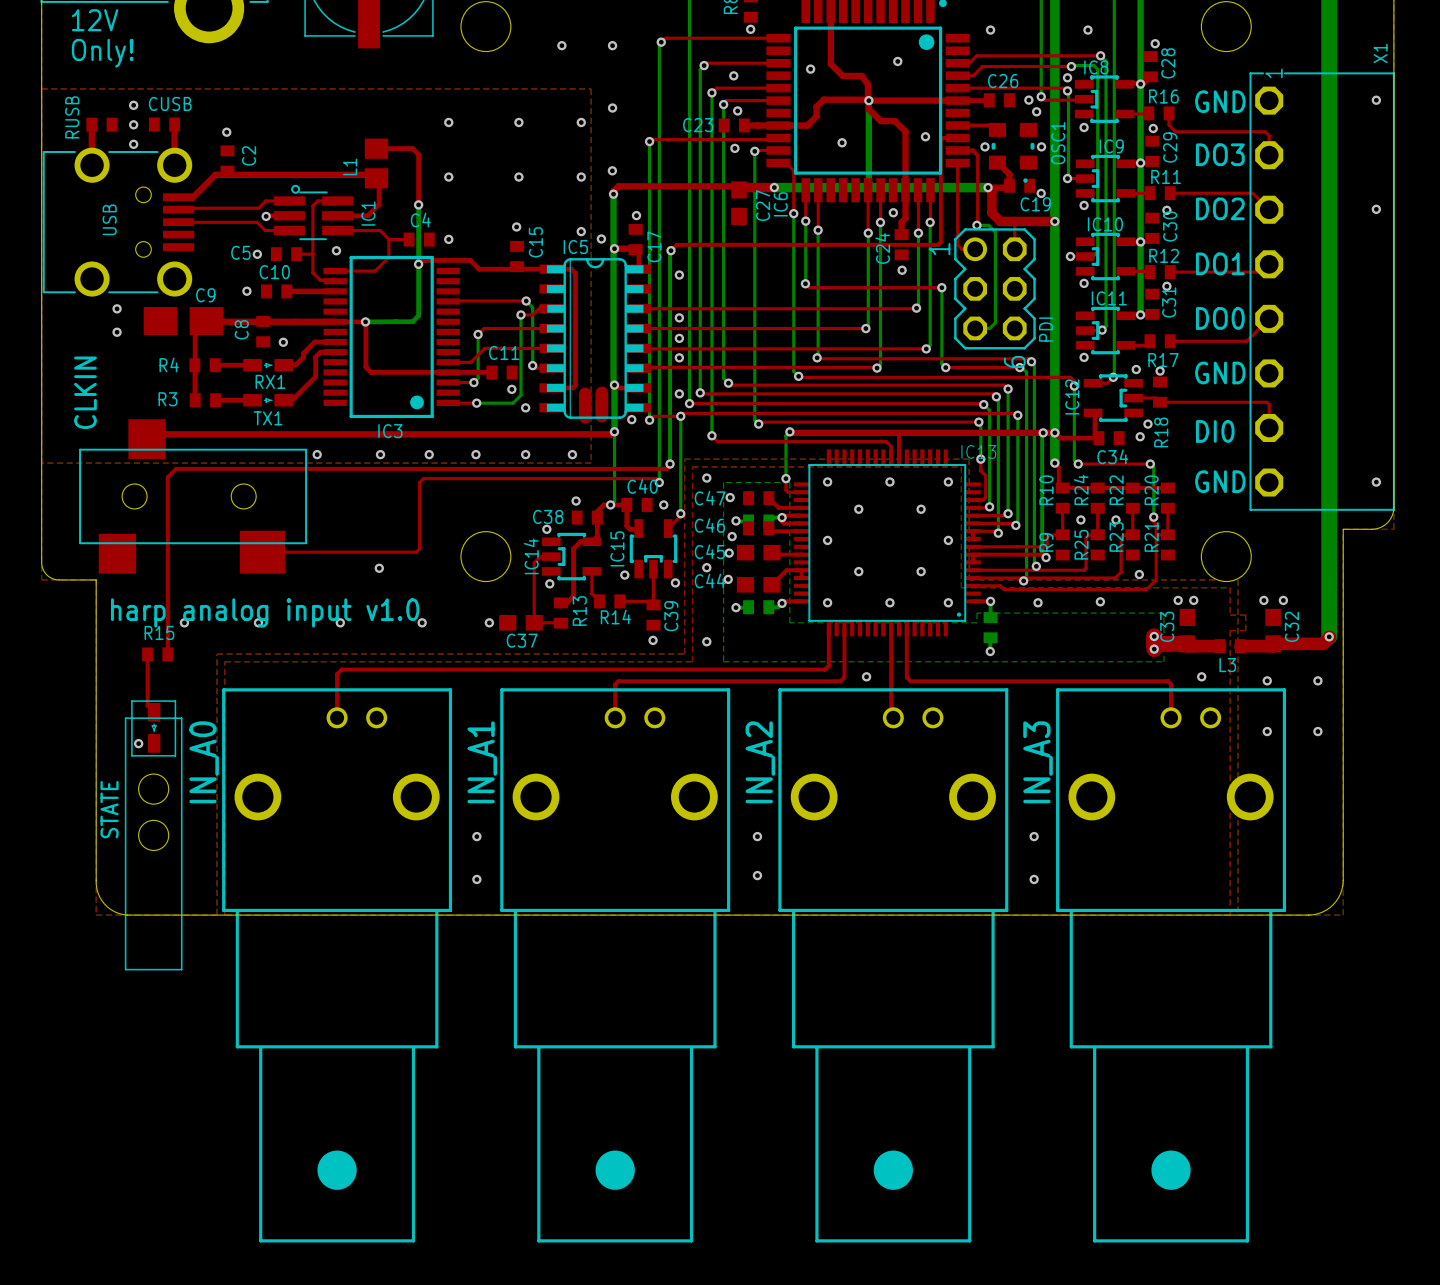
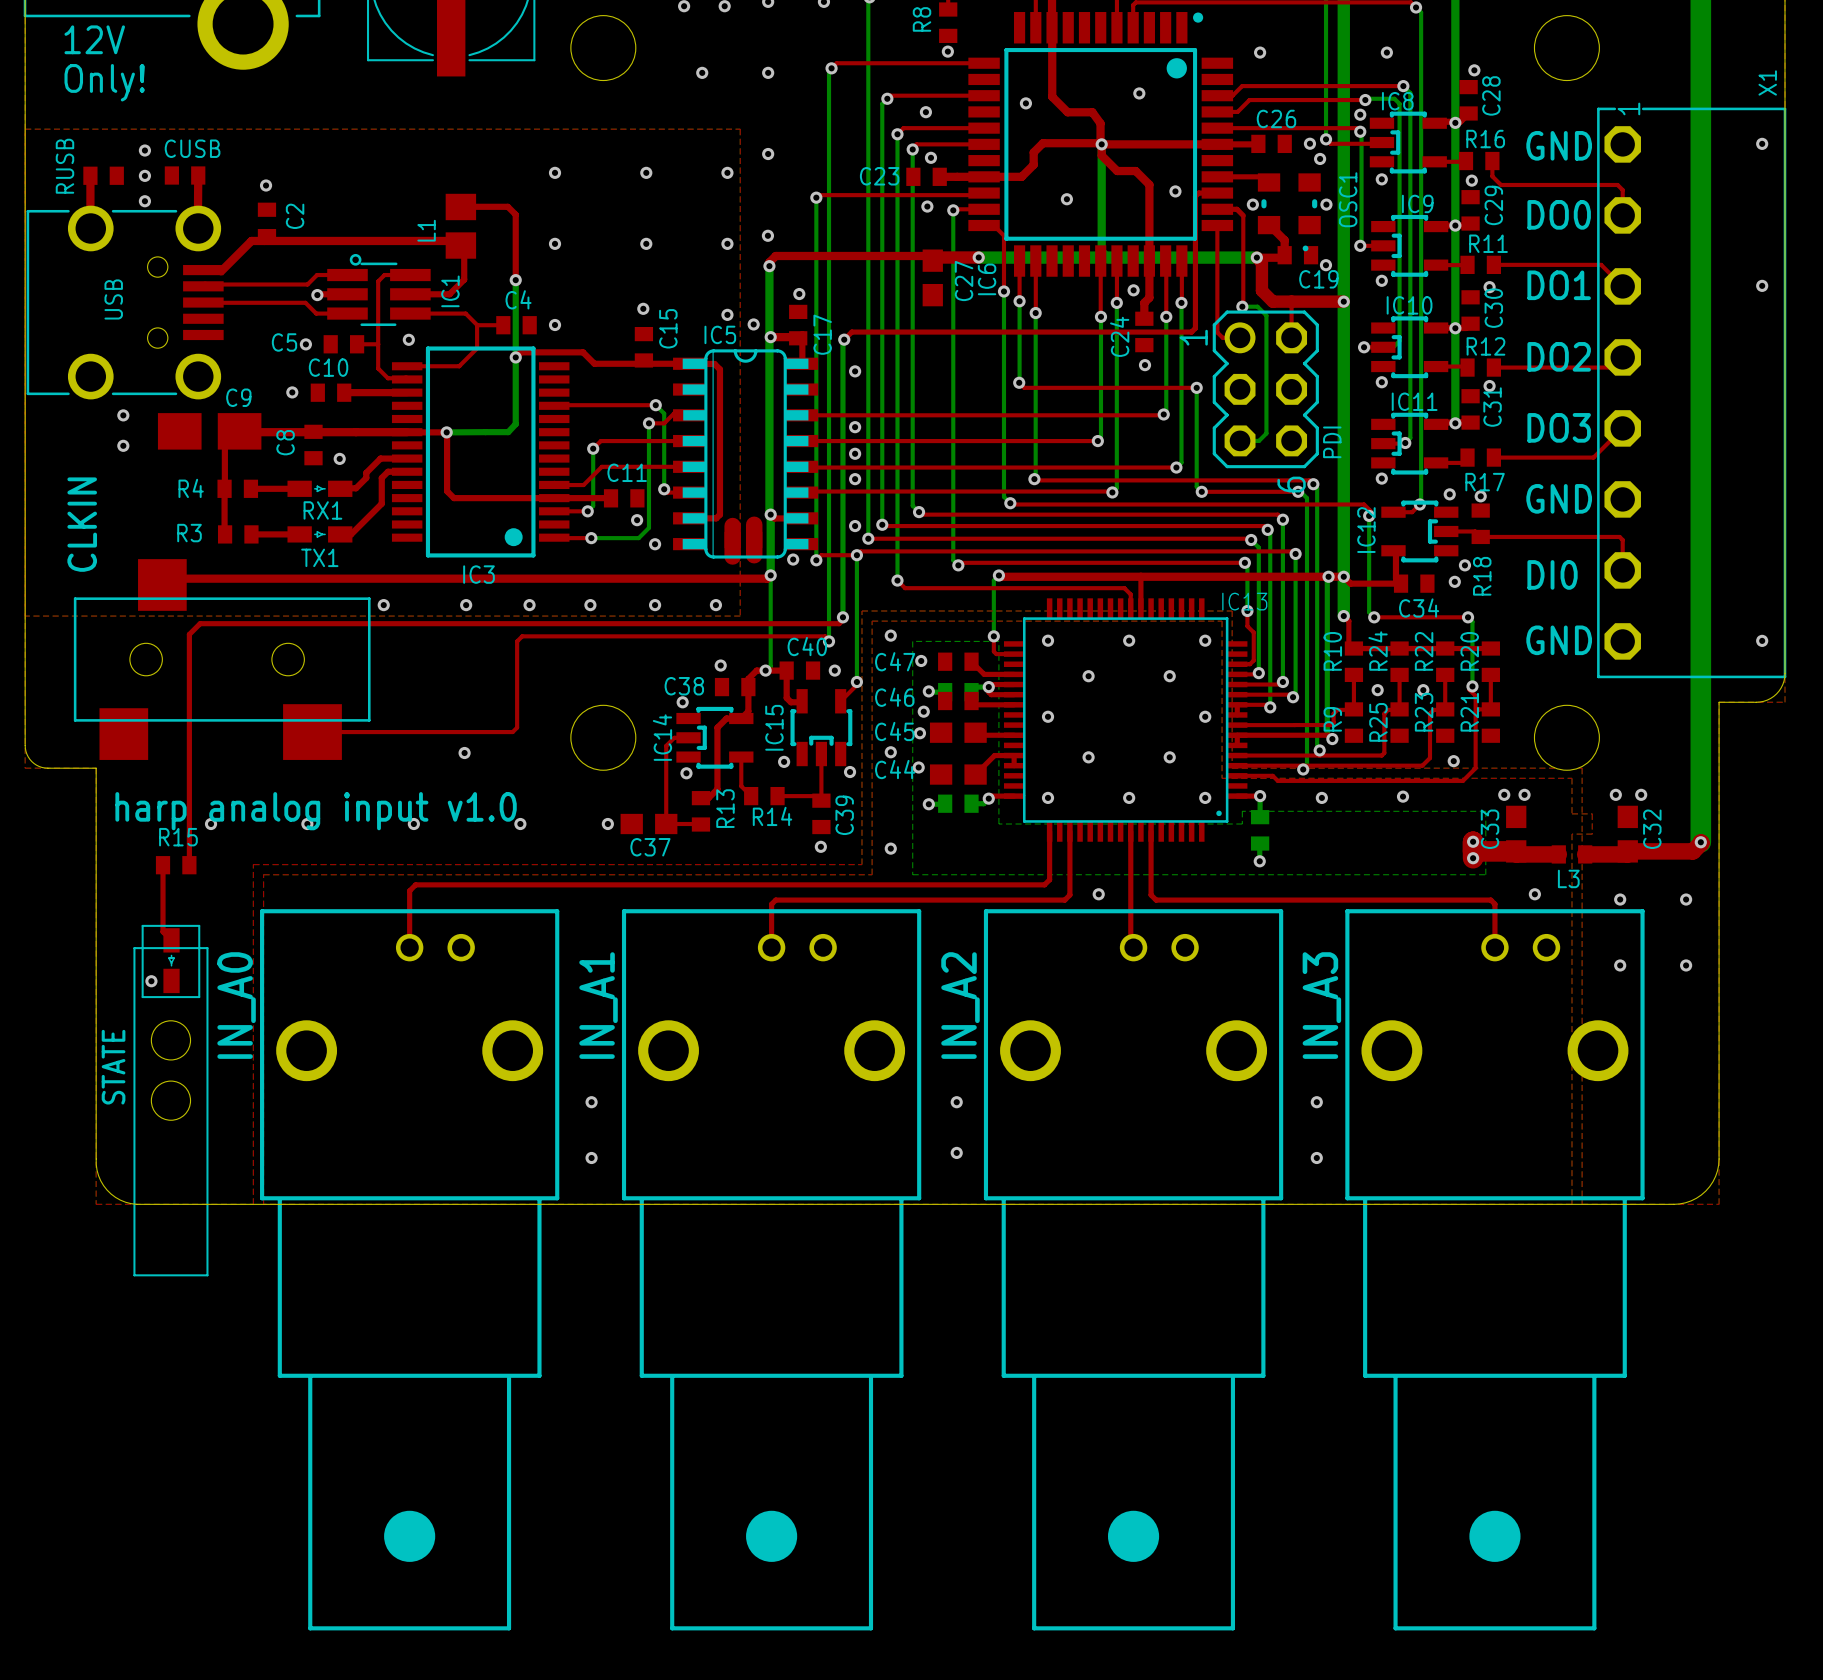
text: DO3 (1220, 154) -> DO0 (1559, 214)
text: DO2 (1220, 208) -> DO1 (1559, 285)
text: DO1 (1220, 263) -> DO2 (1559, 356)
text: DO0 (1220, 318) -> DO3 (1559, 427)

